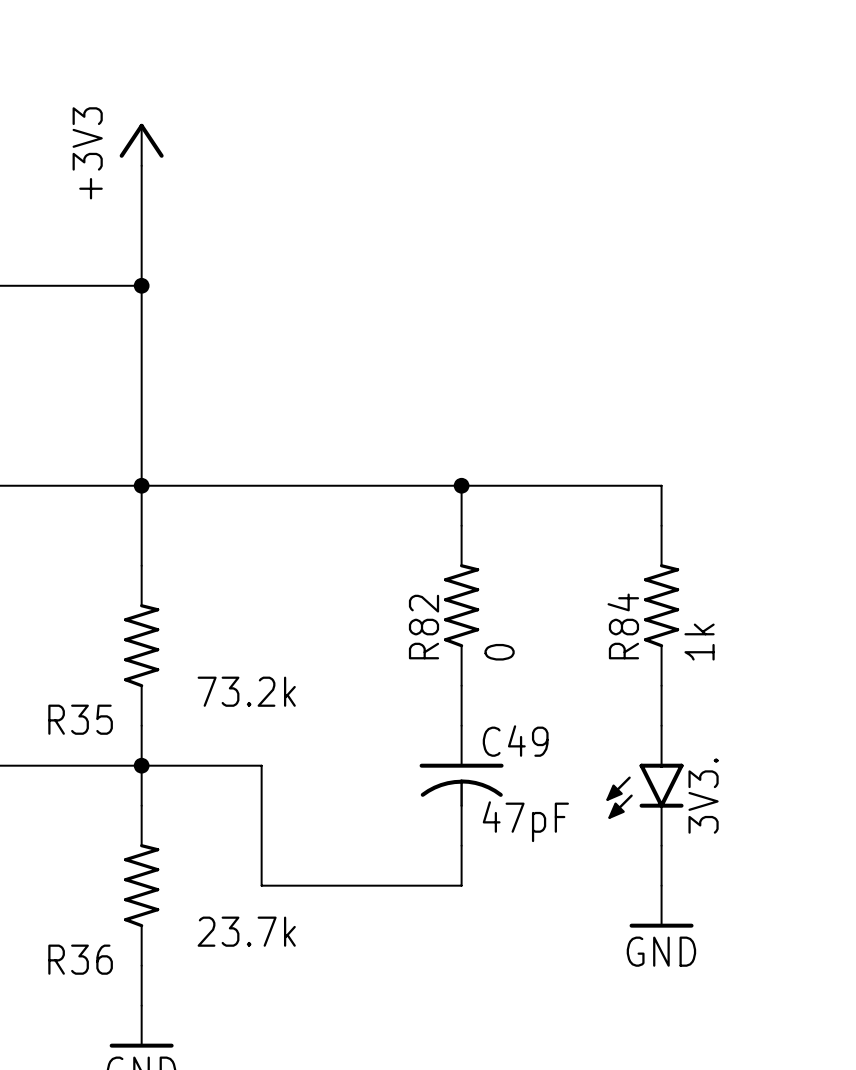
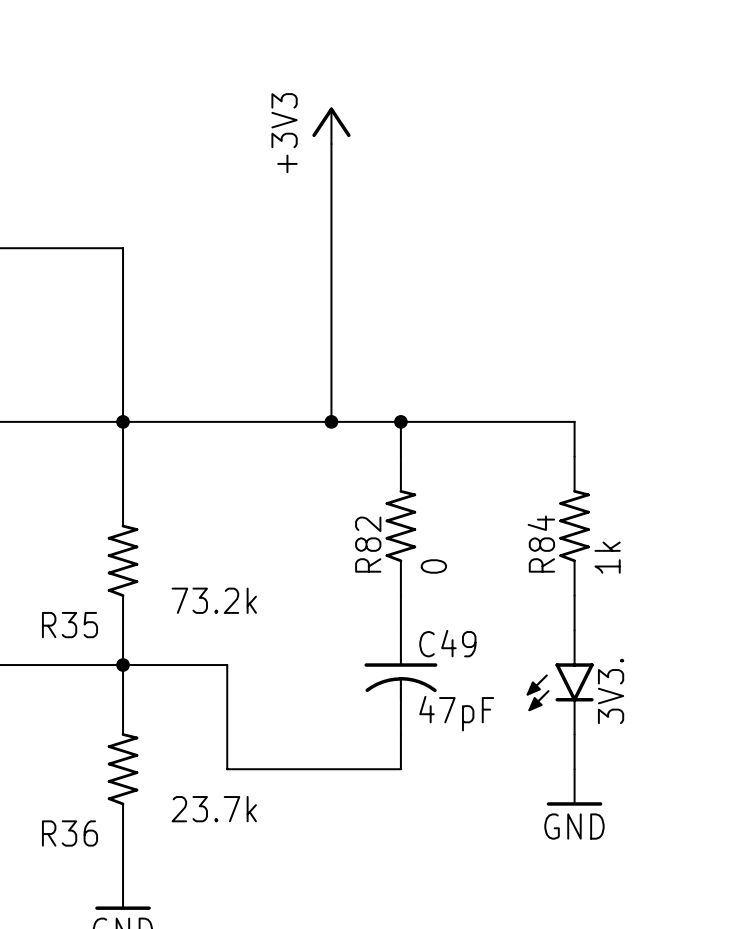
power symbol position: +3V3 (141, 144) -> +3V3 (331, 125)
wire: (141, 165) (141, 285) -> none
wire: none -> (331, 144) (331, 421)
junction: (141, 285) -> none
junction: none -> (331, 421)

